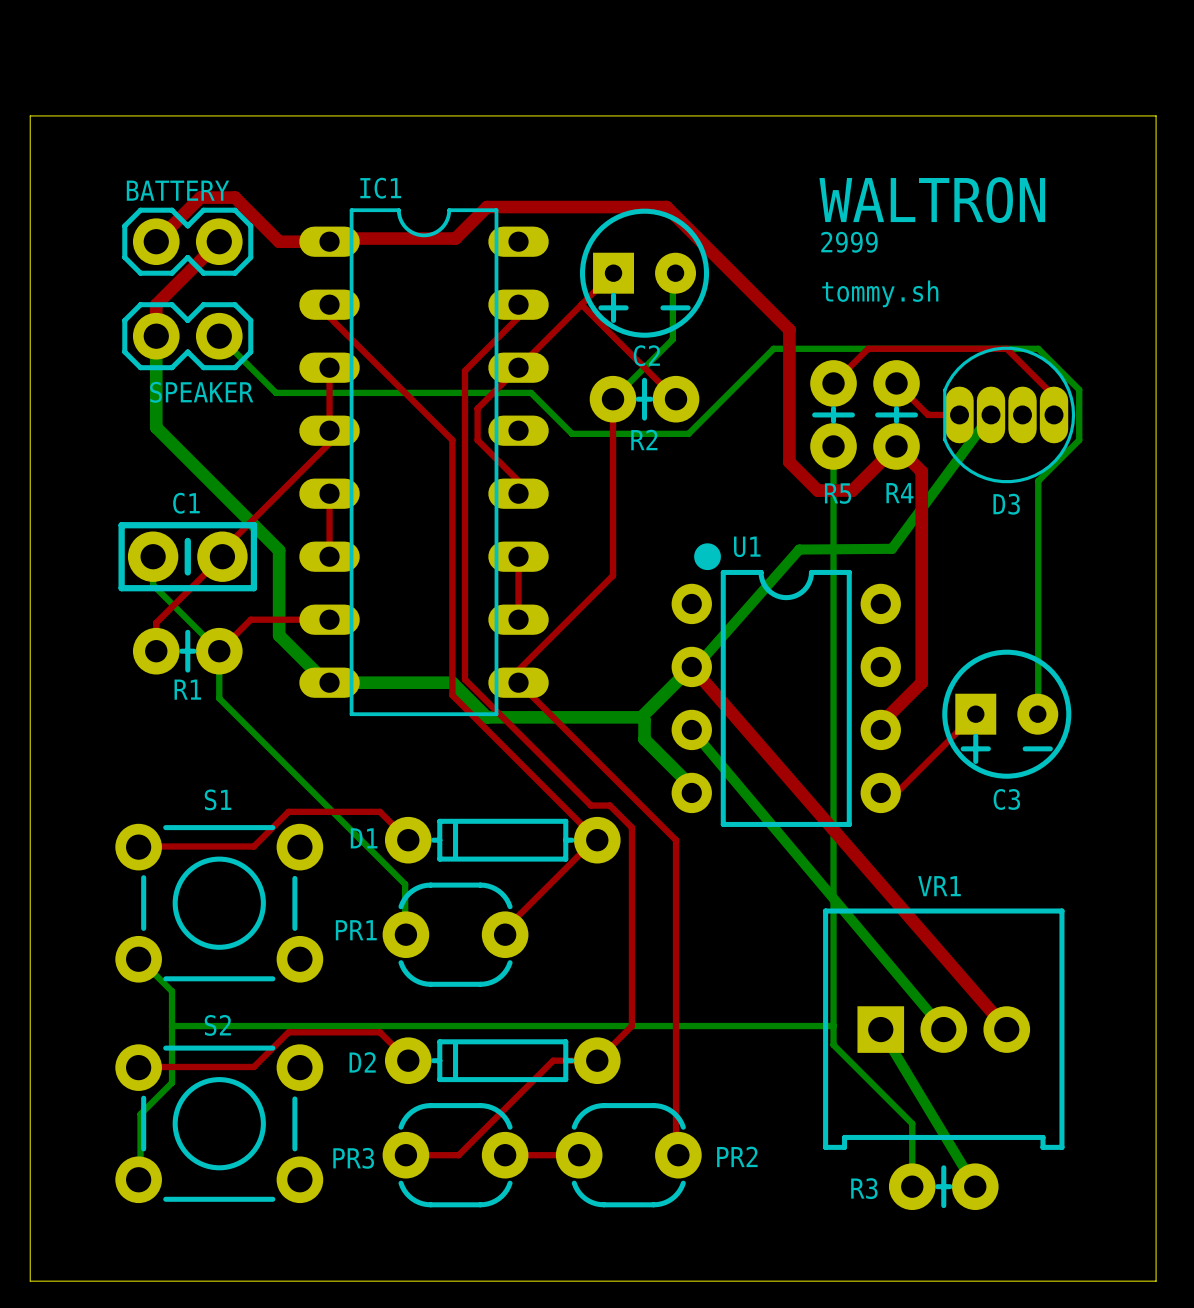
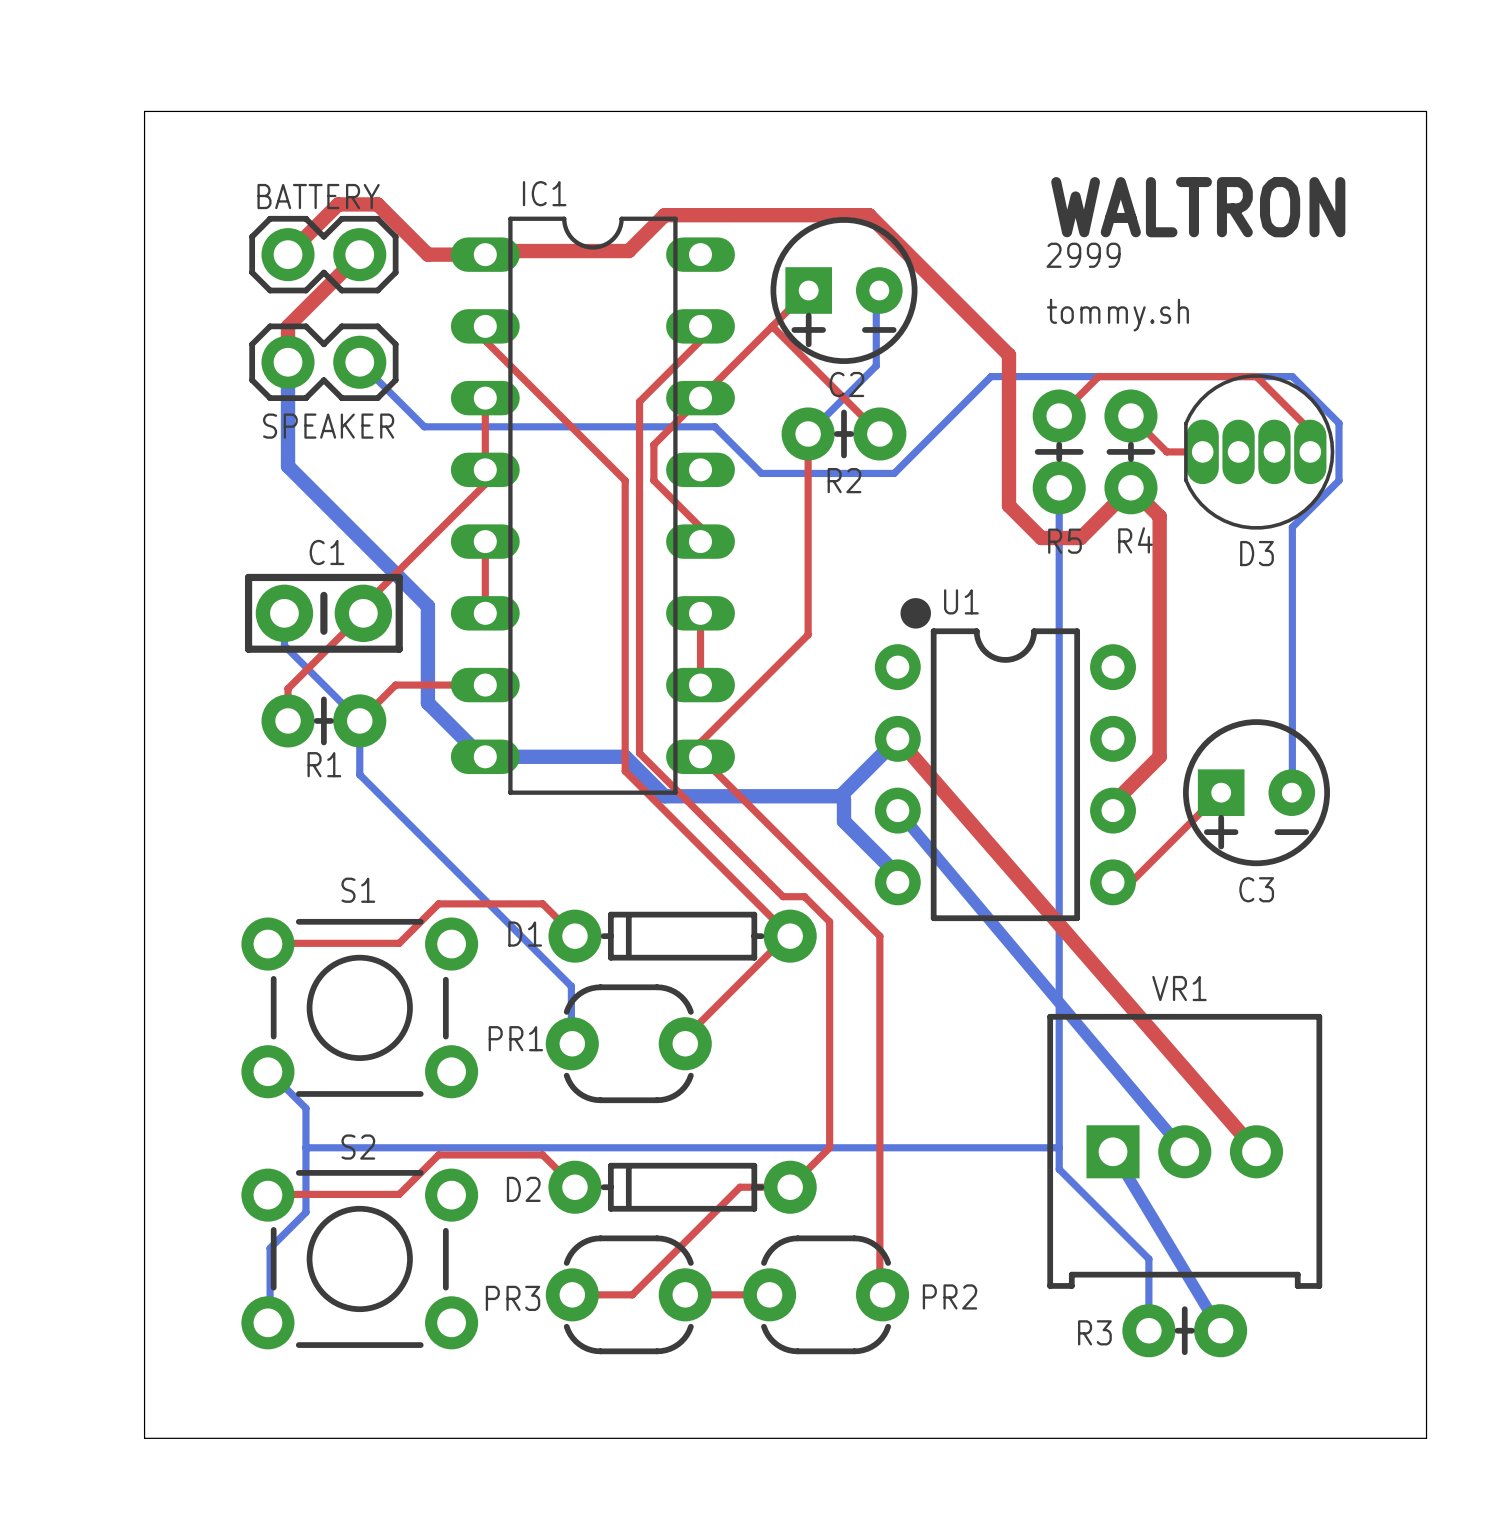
bottom track: (991, 414) (891, 548) (799, 549) (693, 669) (691, 666) -> none

